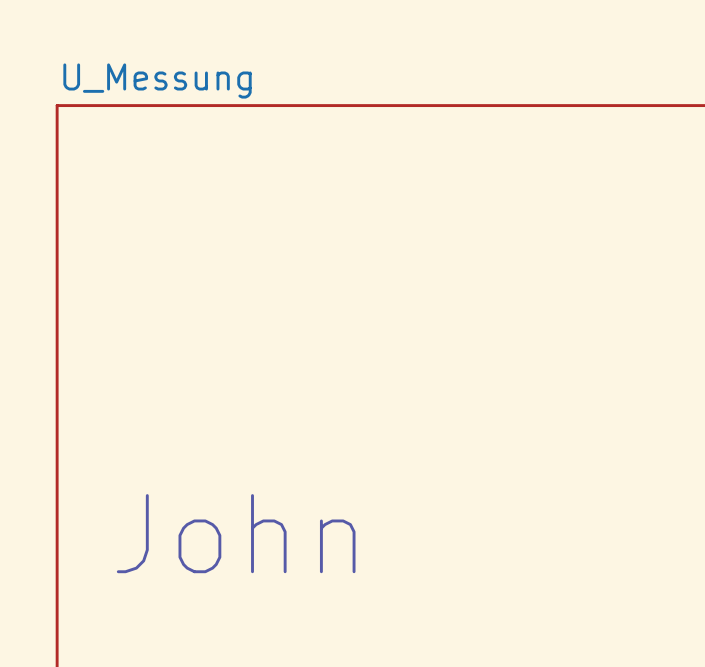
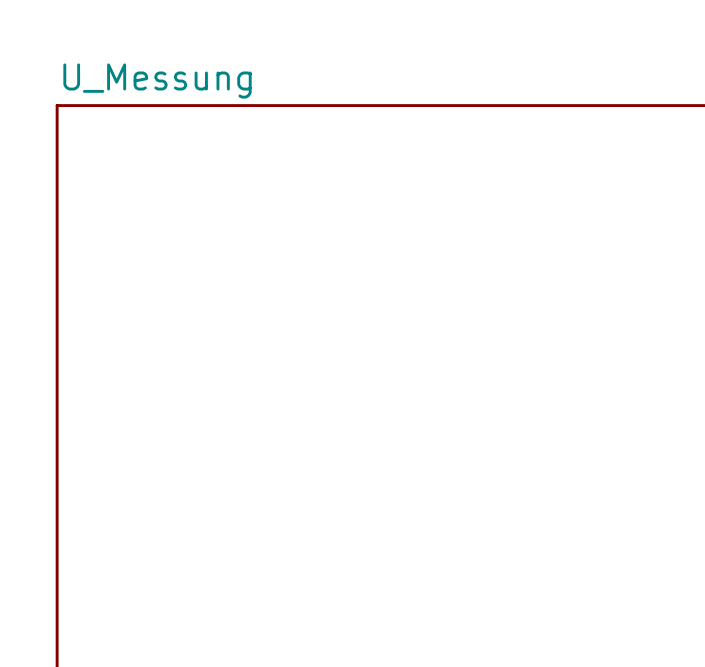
text: John (236, 533) -> none

